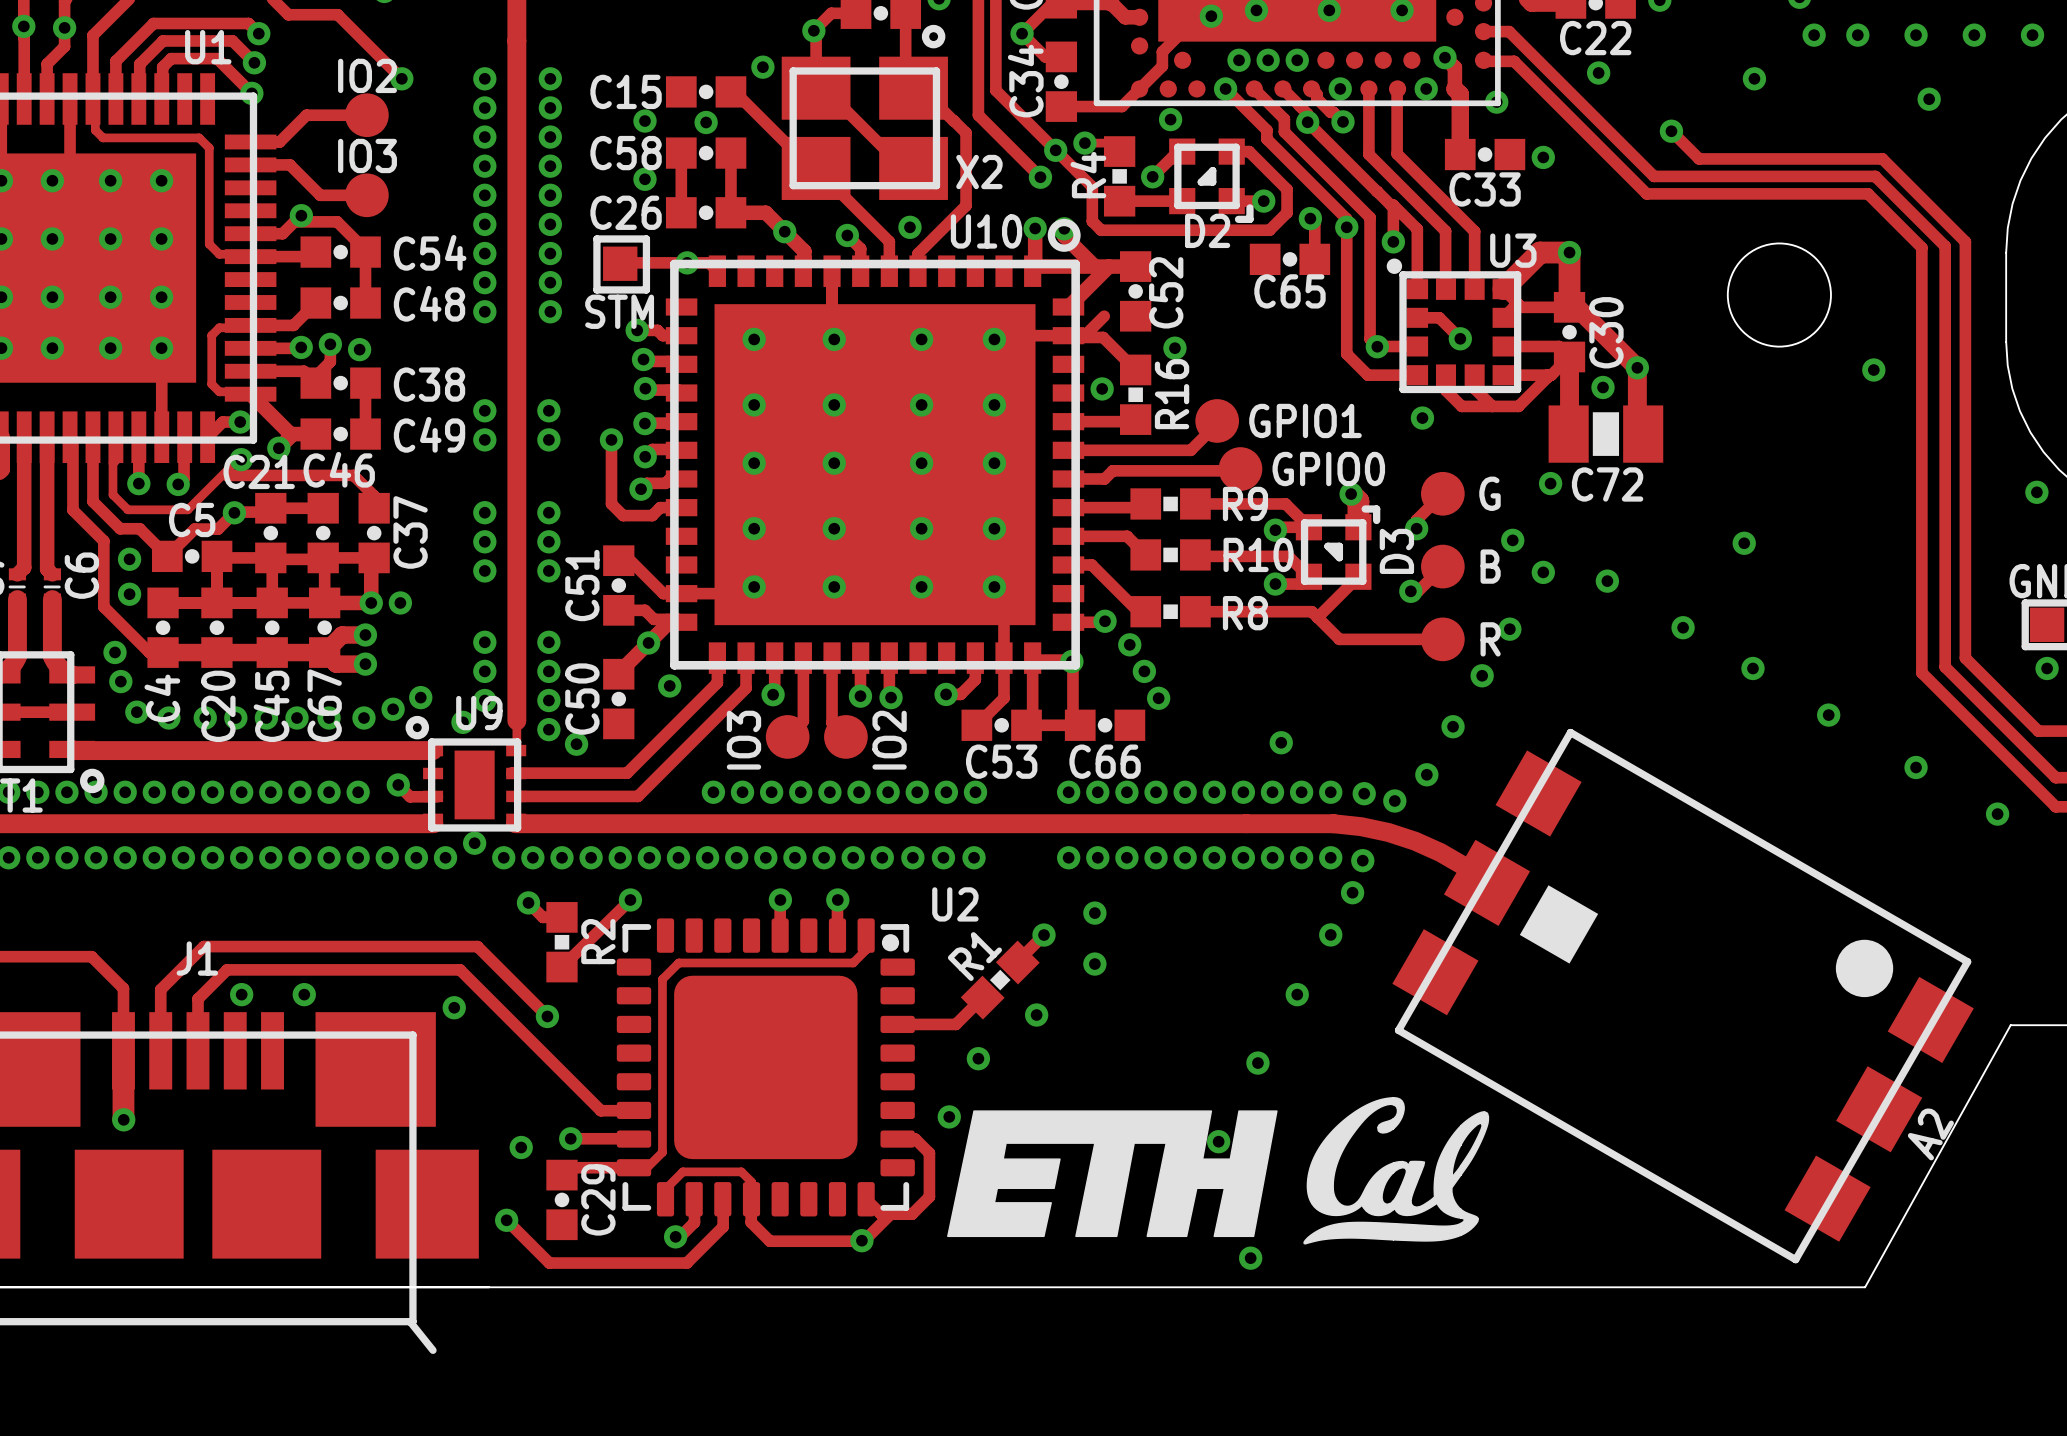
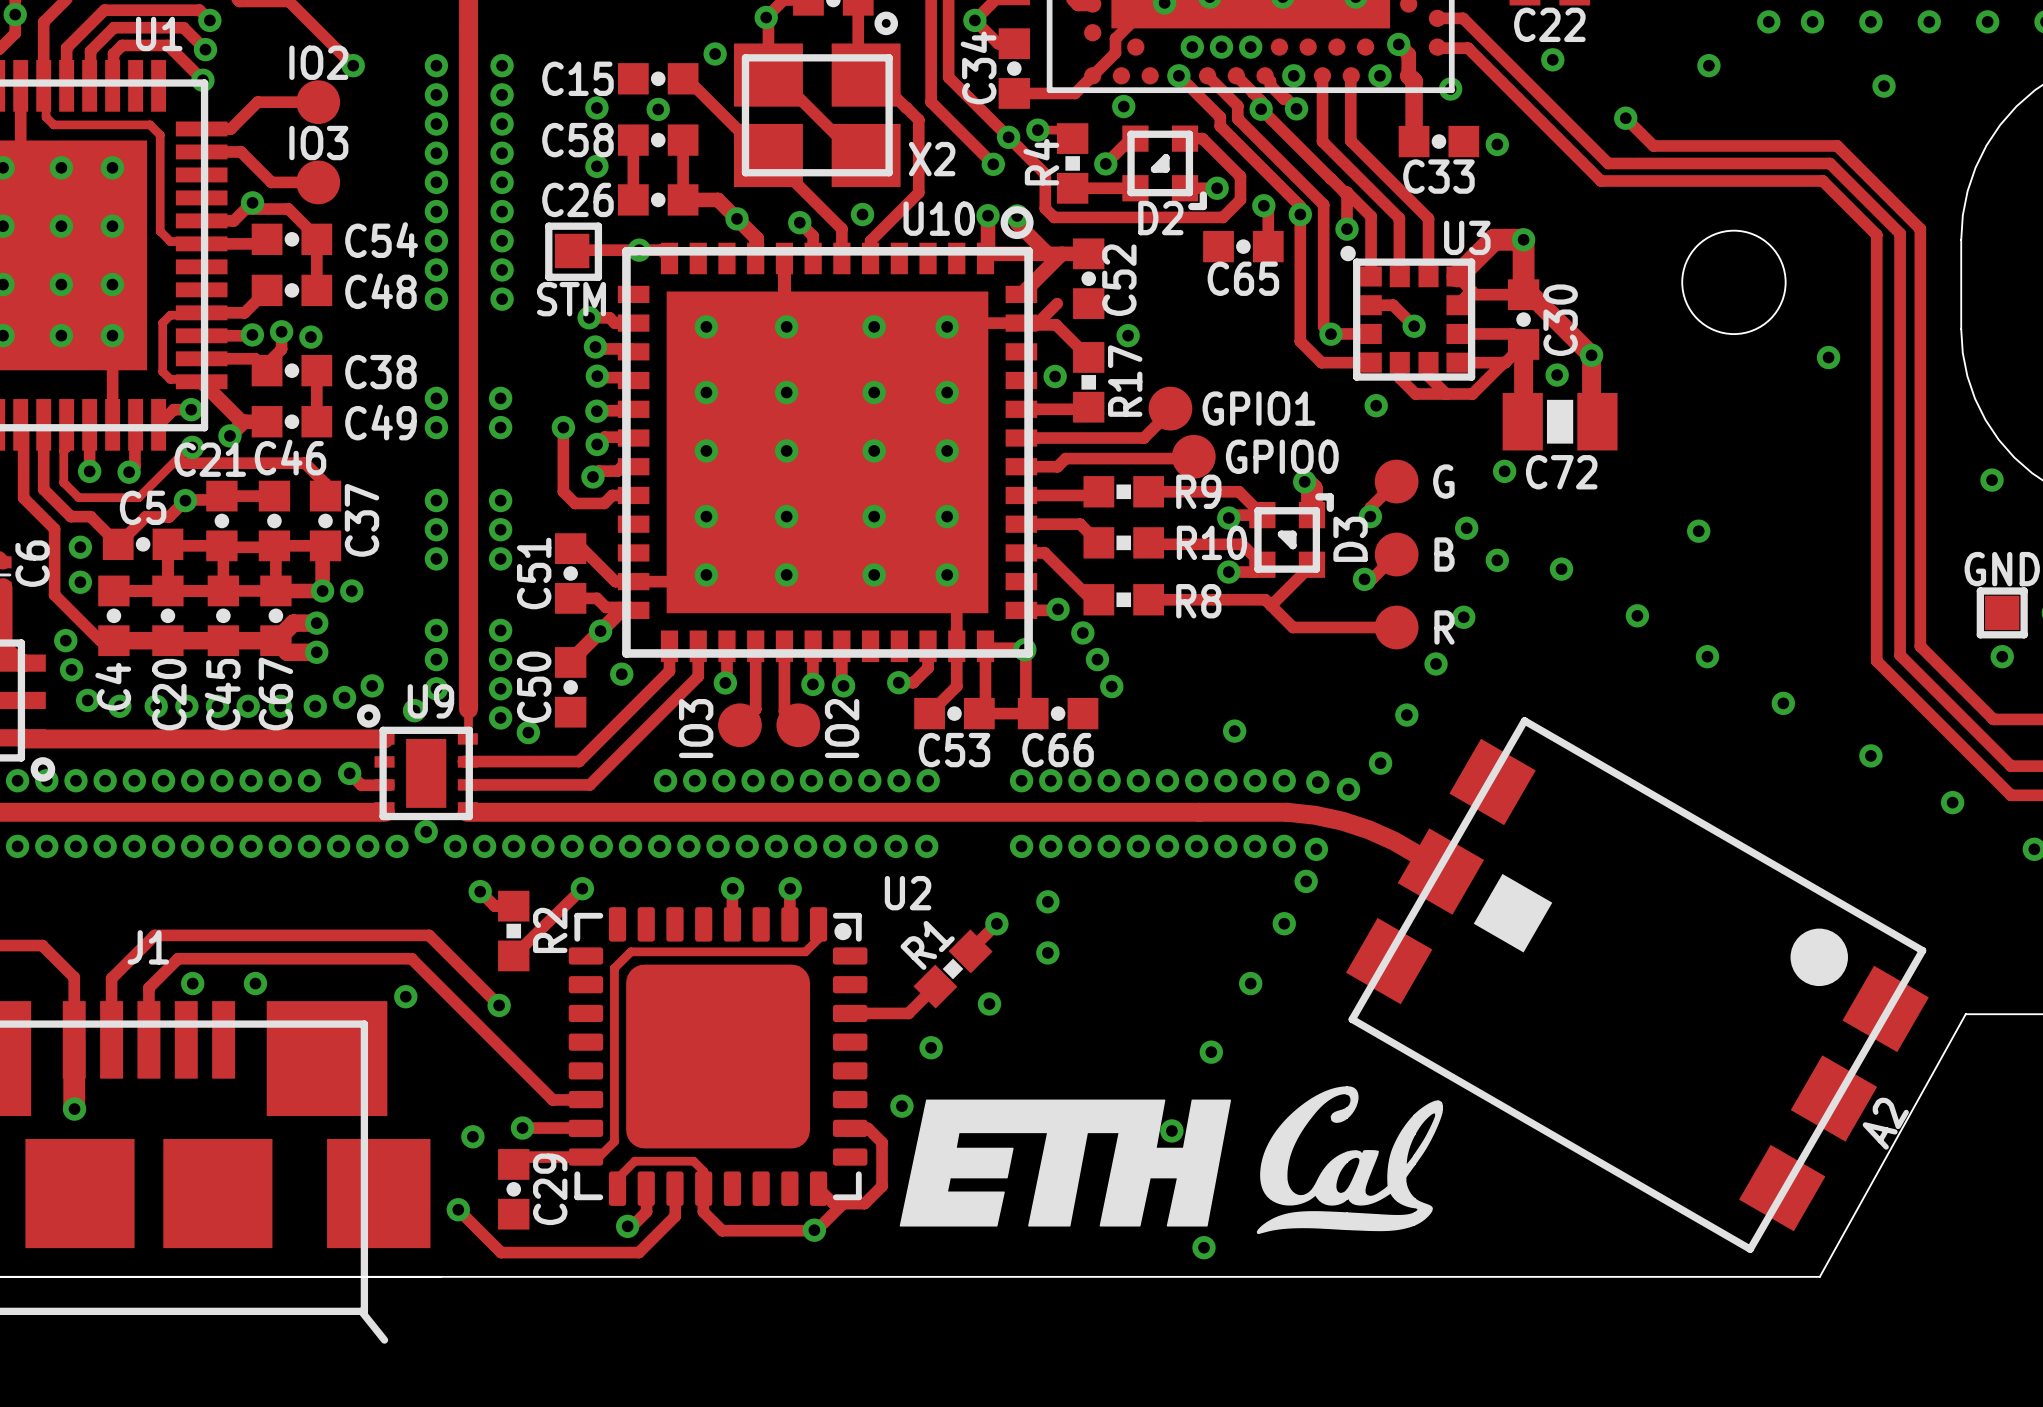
R16 name: R16 (1172, 394) -> R17 (1125, 381)

